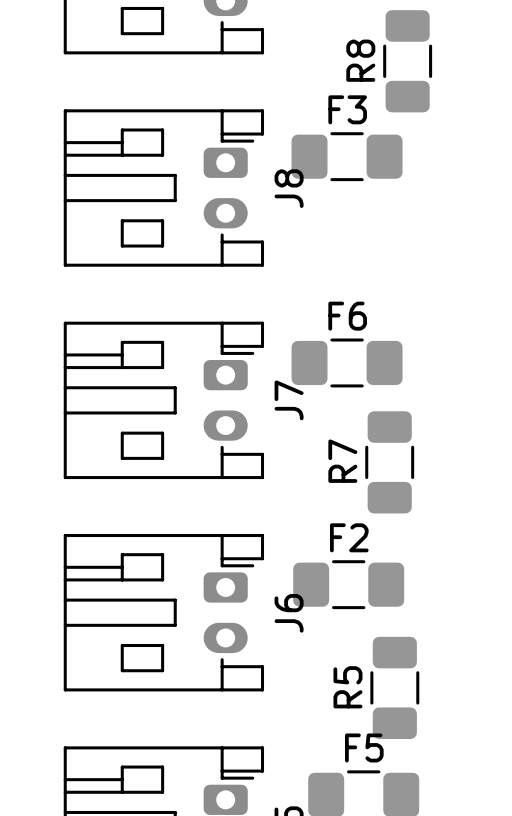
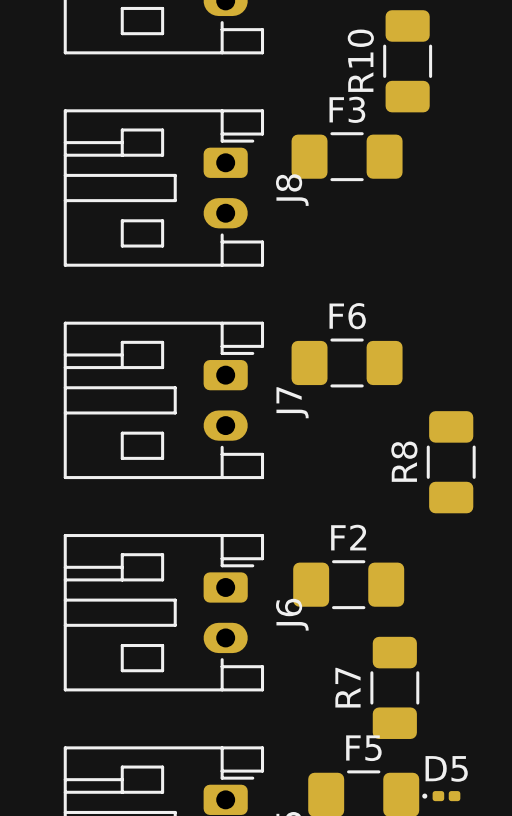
R8 name: R8 (360, 60) -> R10 (360, 60)
R7: (389, 462) -> none
R8: none -> (451, 462)
R5 name: R5 (347, 687) -> R7 (347, 687)
D5: none -> (441, 796)

